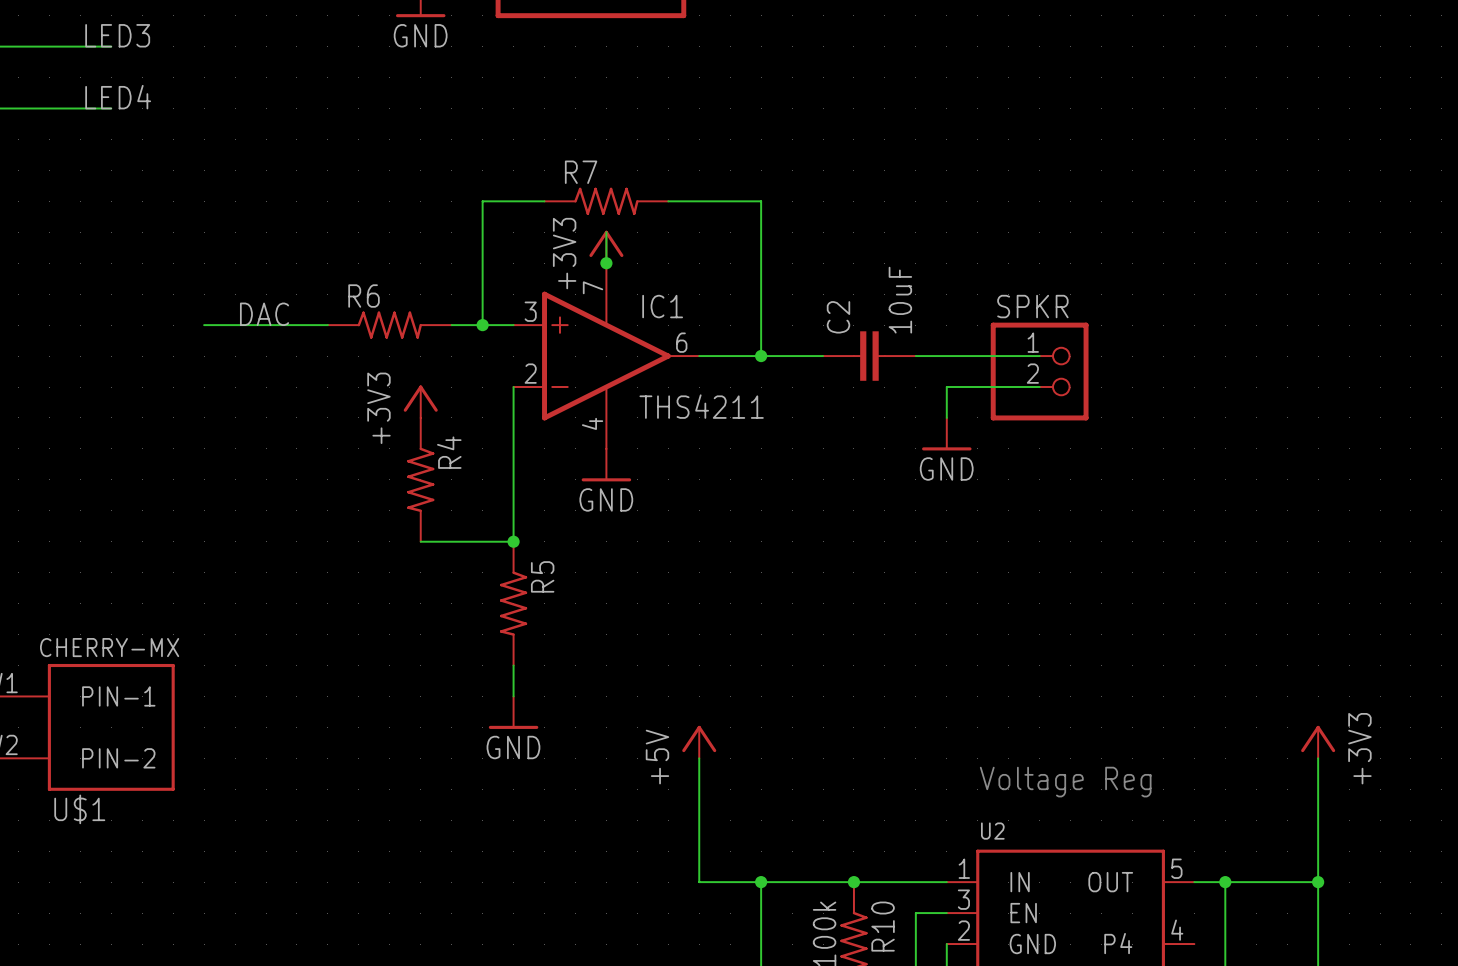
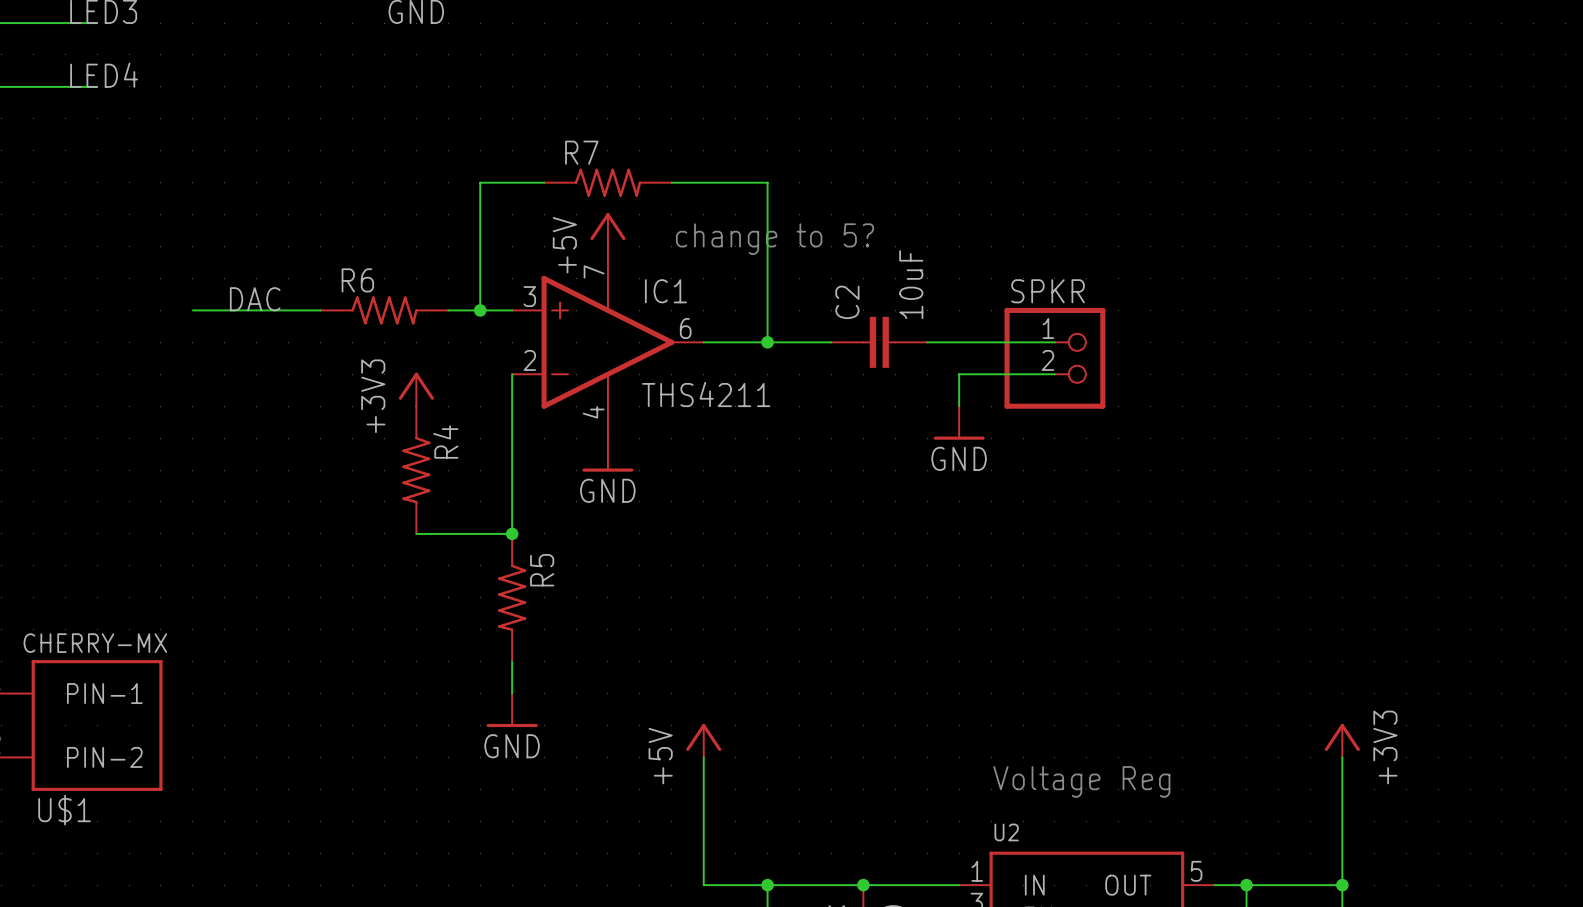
power symbol: +3V3 (606, 246) -> +5V (607, 229)
text: none -> change to 5? (775, 239)
junction: (606, 263) -> none

